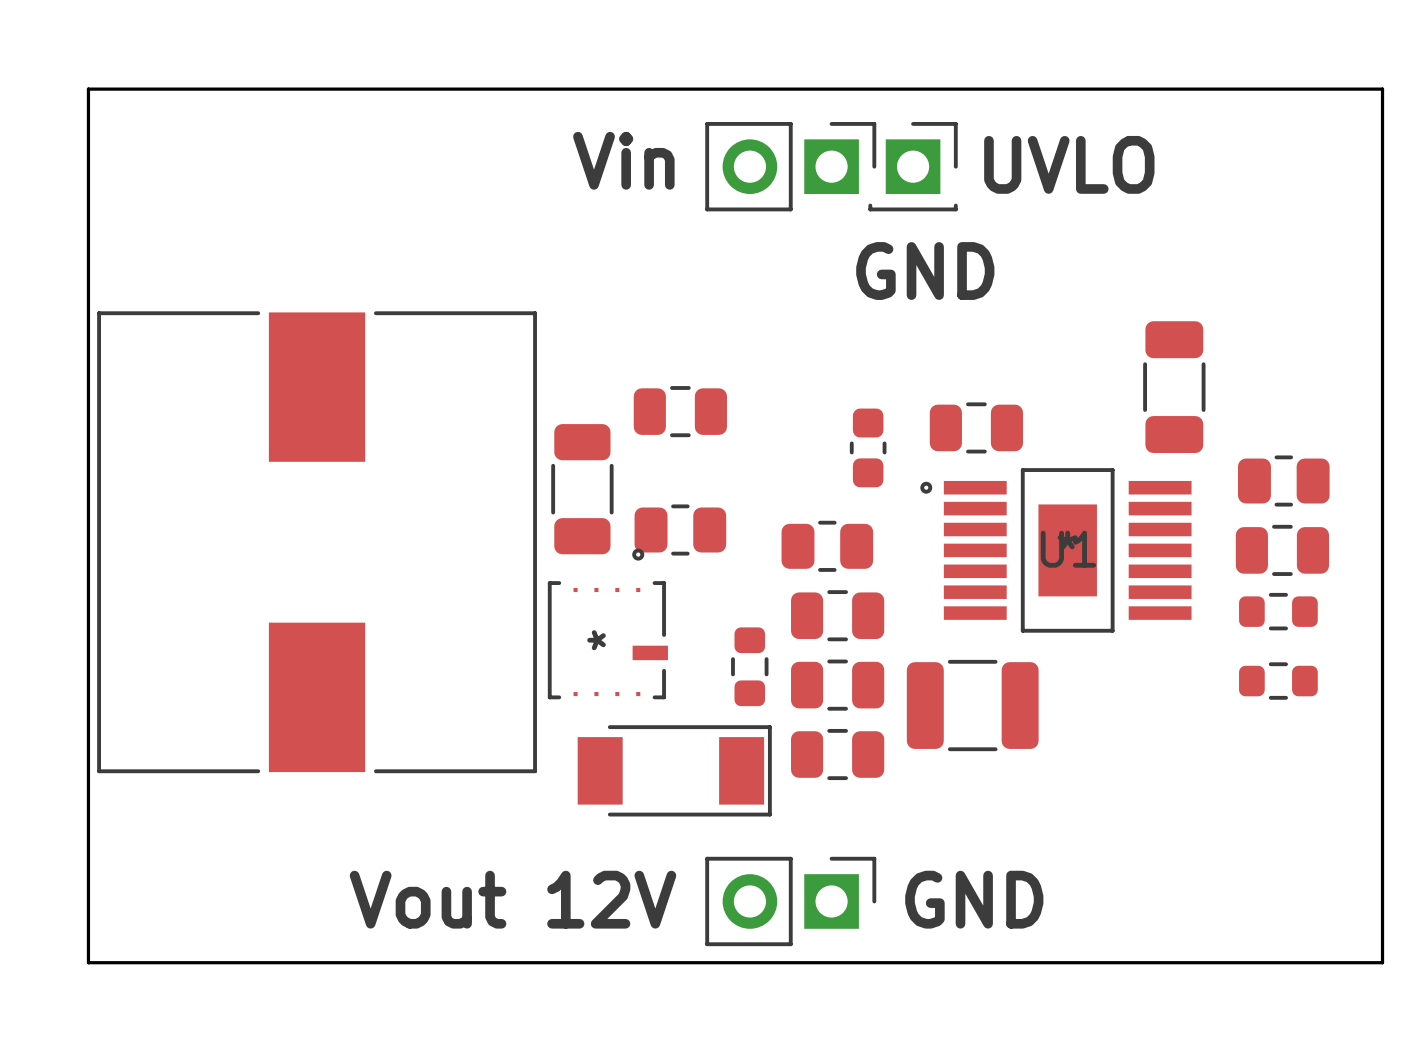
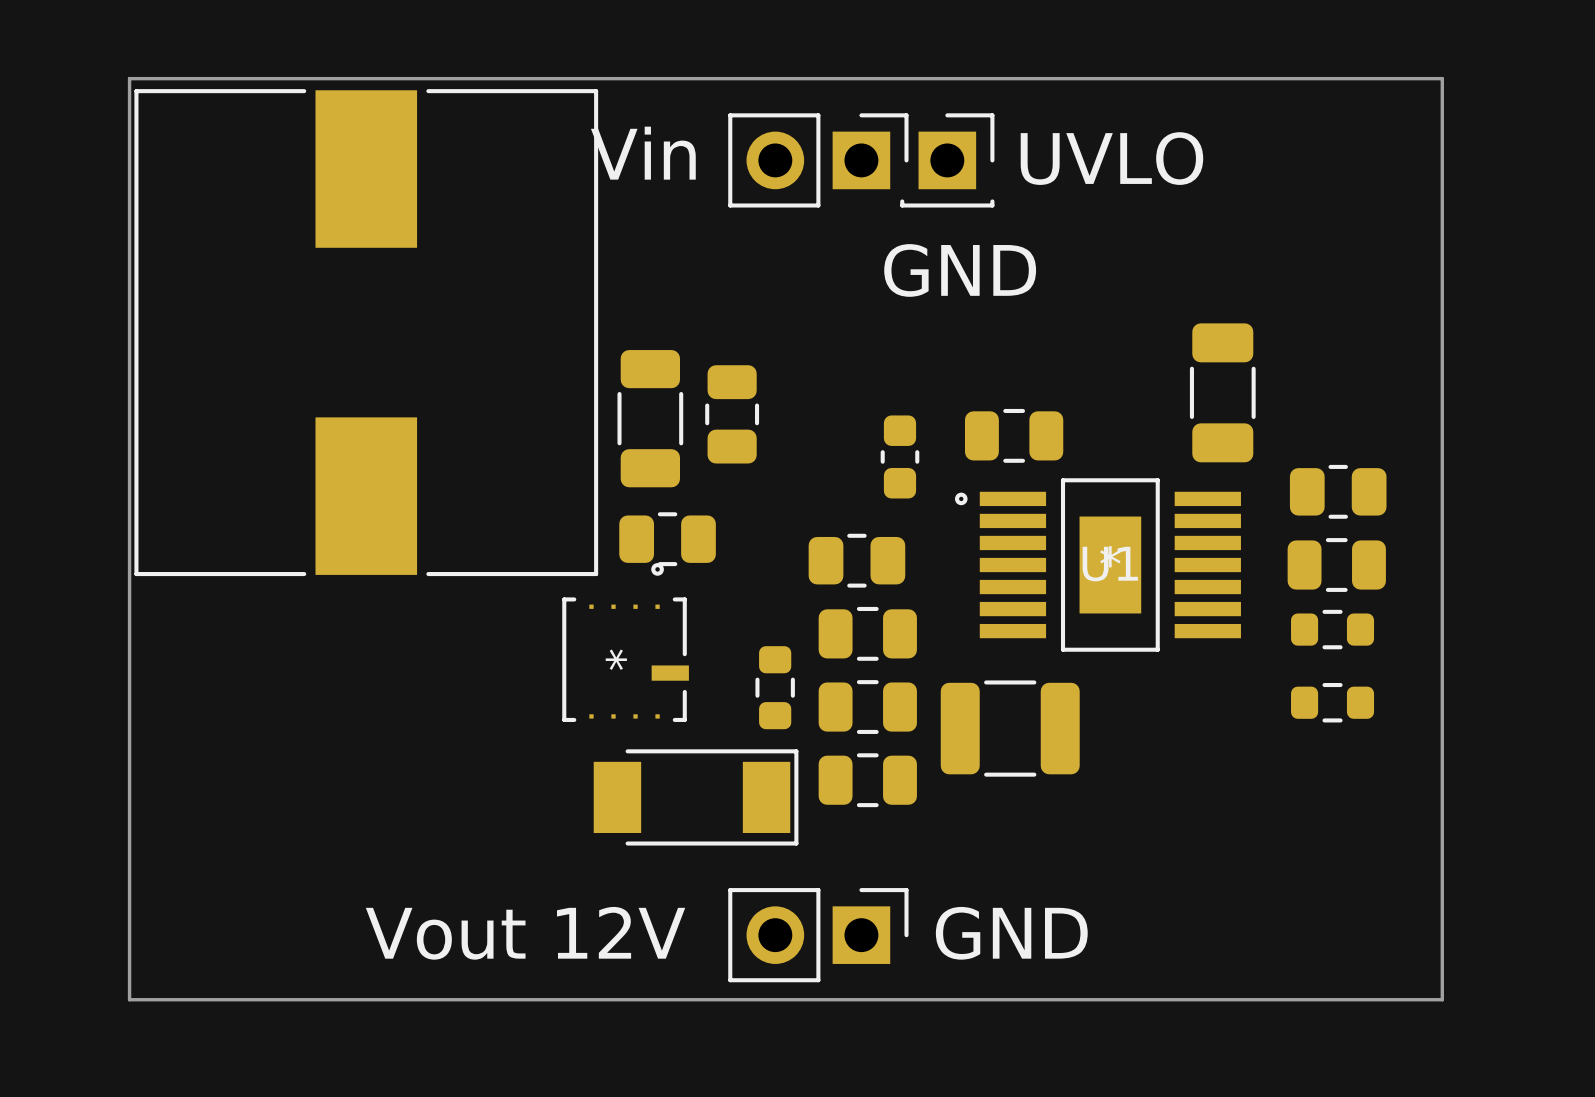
board edge: (137, 89) (88, 89) (88, 962) (137, 962) -> (129, 78) (129, 999)
part rotation: 0° (680, 411) -> 90° clockwise (732, 414)
part position: (582, 489) -> (650, 418)
part position: (680, 529) -> (667, 539)
part position: (317, 542) -> (366, 332)

